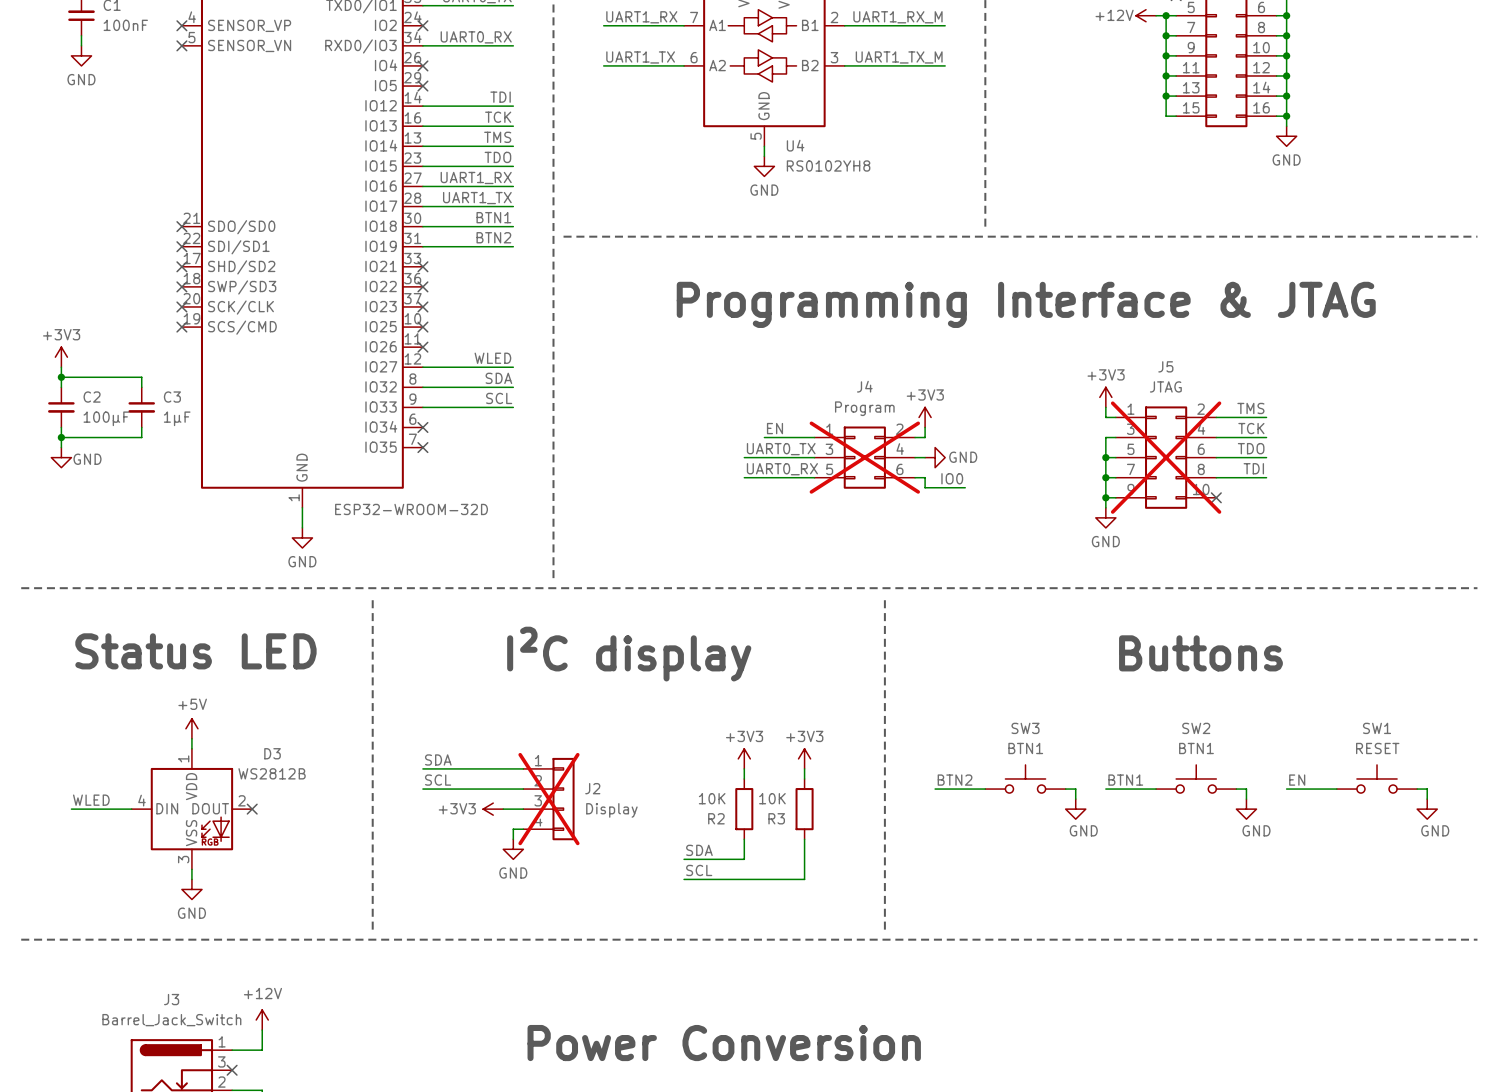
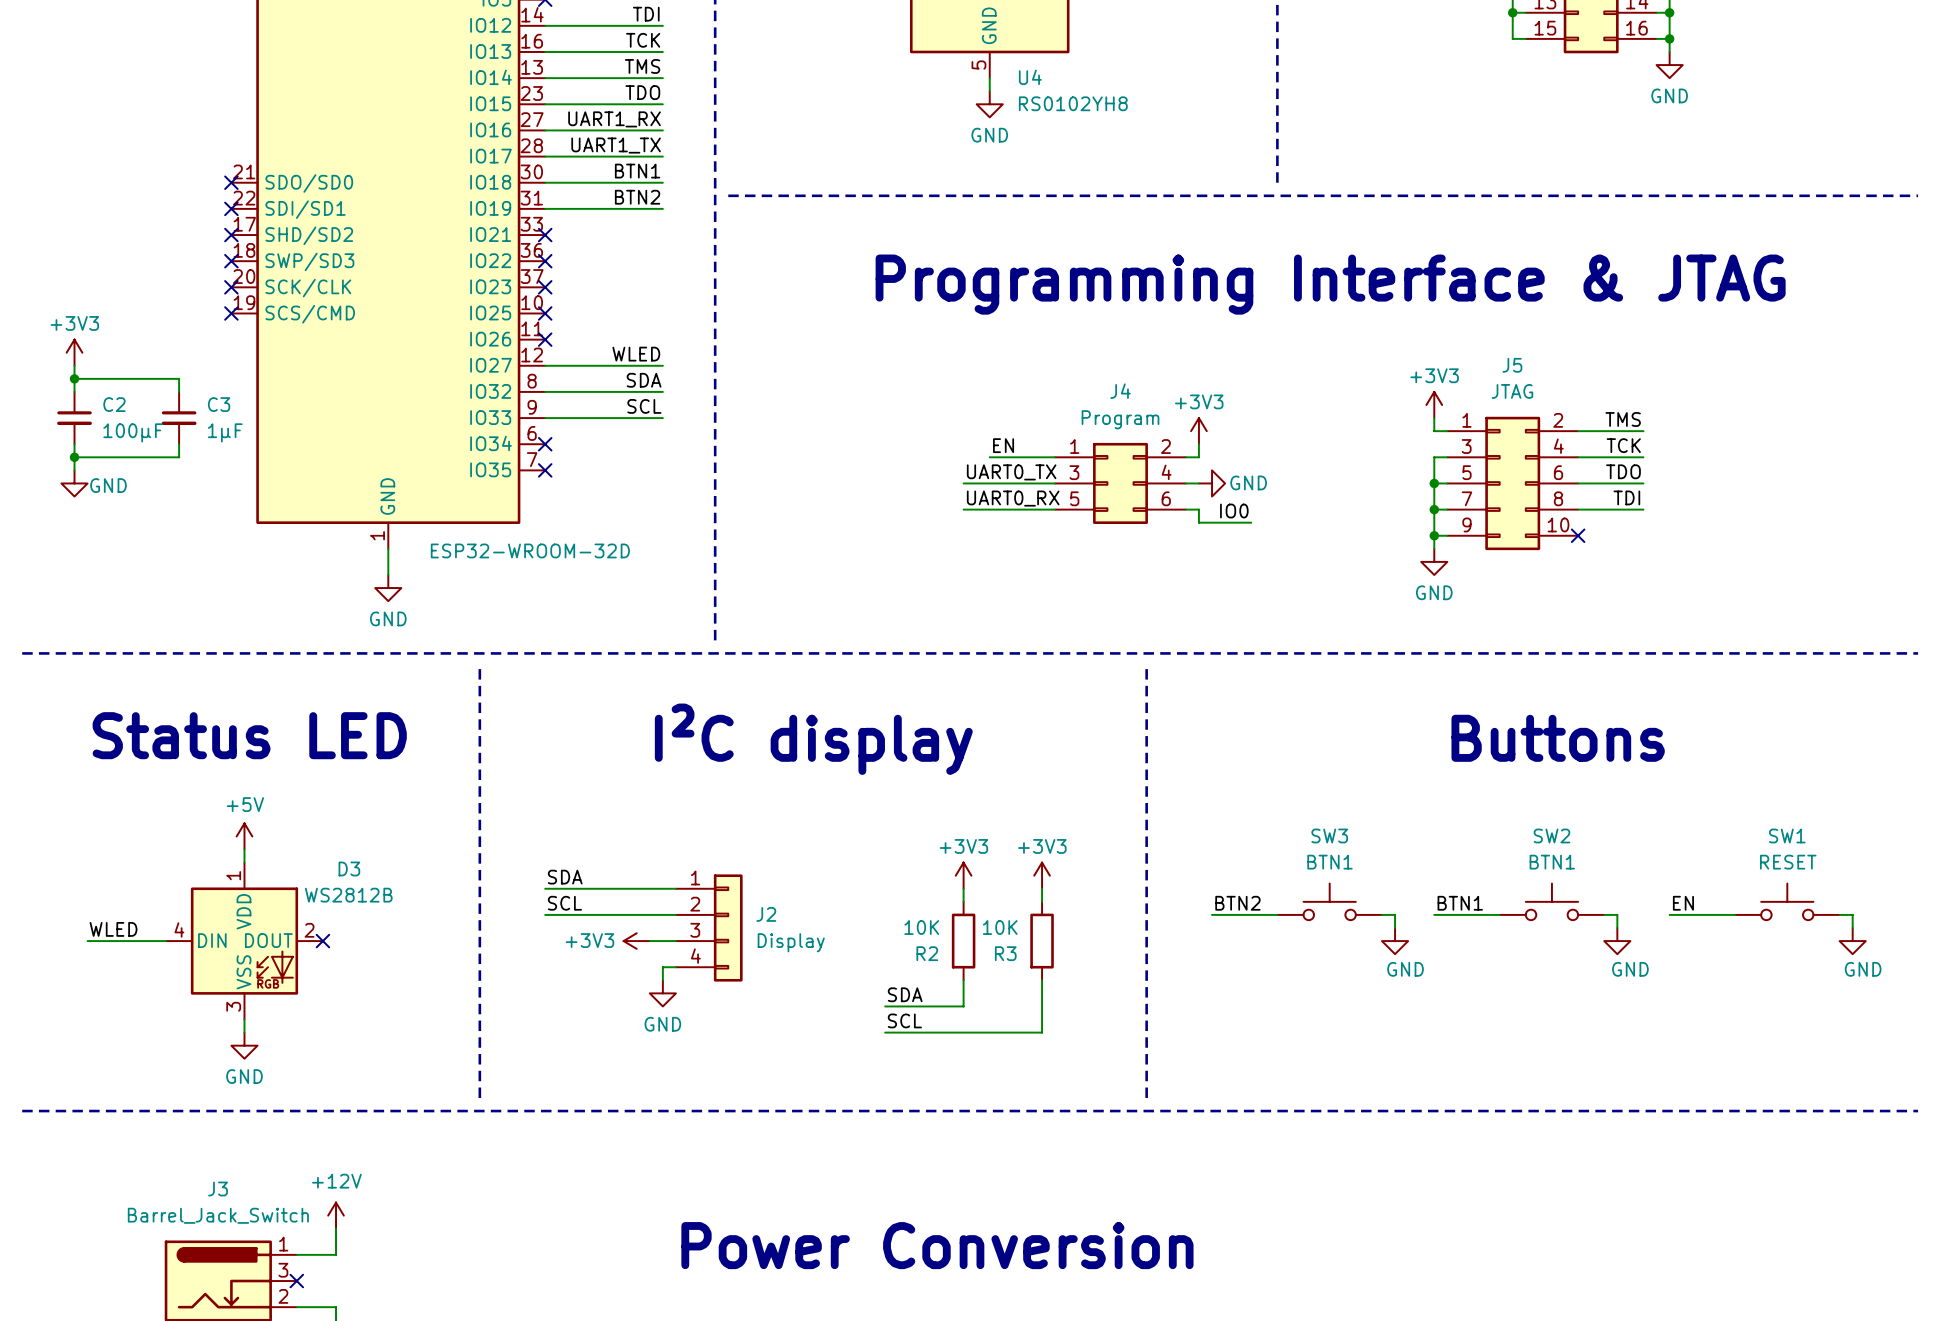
J4 do-not-place cross: (864, 457) -> none
J5 do-not-place cross: (1166, 457) -> none
J2 do-not-place cross: (548, 799) -> none

